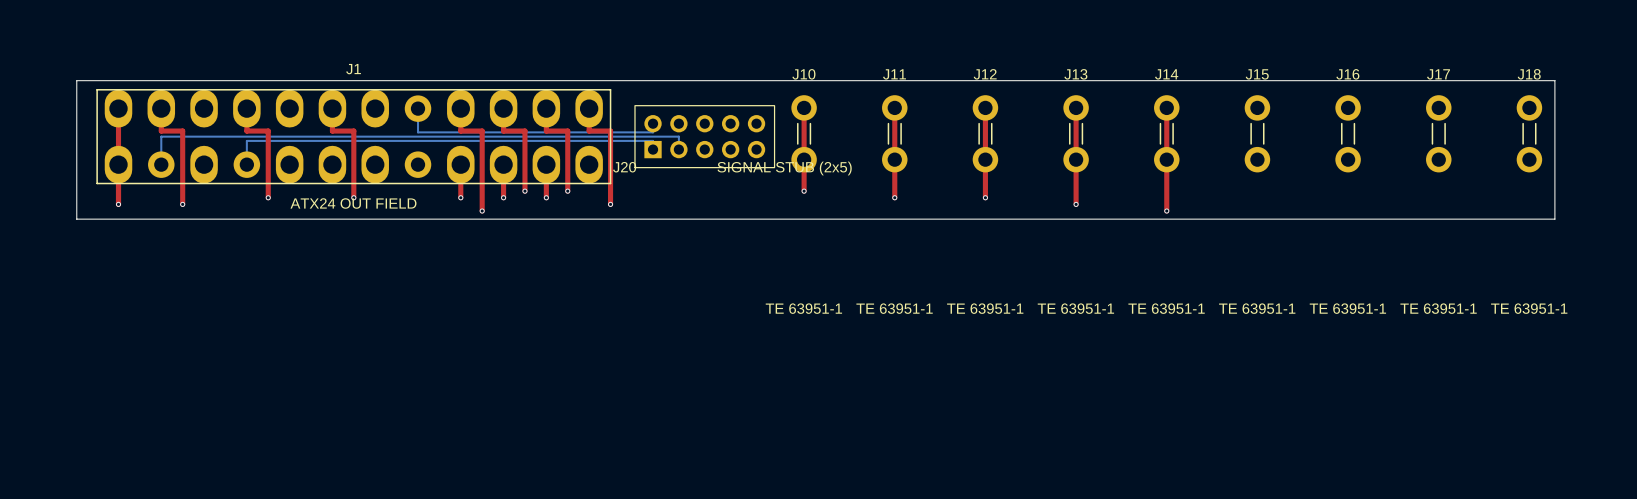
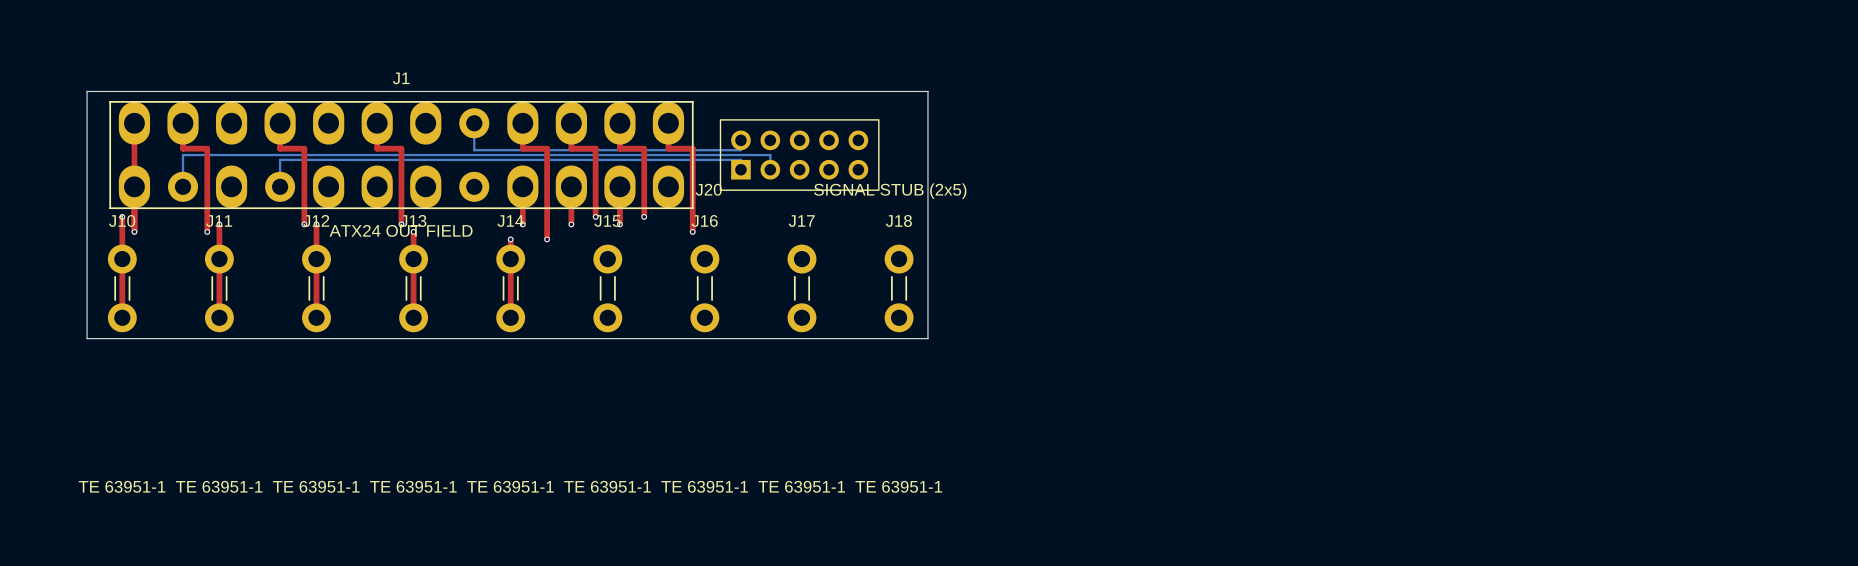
board edge: (817, 80) (1554, 80) (1554, 219) (76, 219) -> (927, 91) (927, 338) (87, 338) (87, 248)
top track: (804, 107) (804, 191) -> none
top track: (894, 107) (894, 197) -> none
top track: (985, 107) (985, 197) -> none
top track: (1076, 107) (1076, 204) -> none
top track: (1166, 107) (1166, 211) -> none
J10 position: (804, 133) -> (122, 288)
J11 position: (894, 133) -> (219, 288)
J12 position: (985, 133) -> (316, 288)
J13 position: (1076, 133) -> (413, 288)
J14 position: (1166, 133) -> (510, 288)
J15 position: (1257, 133) -> (607, 288)
J16 position: (1348, 133) -> (704, 288)
J17 position: (1438, 133) -> (801, 288)
J18 position: (1529, 133) -> (899, 288)
top track: none -> (122, 216) (122, 317)
via: none -> (122, 216)
via: (804, 191) -> none
top track: none -> (219, 224) (219, 317)
via: none -> (219, 224)
top track: none -> (316, 224) (316, 317)
via: none -> (316, 224)
via: (894, 197) -> none
via: (985, 197) -> none
top track: none -> (413, 231) (413, 317)
via: none -> (413, 231)
via: (1076, 204) -> none
top track: none -> (510, 239) (510, 317)
via: none -> (510, 239)
via: (1166, 211) -> none

